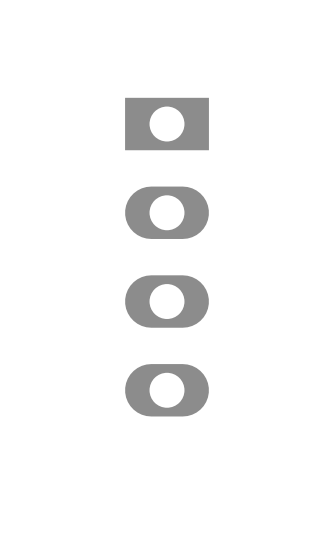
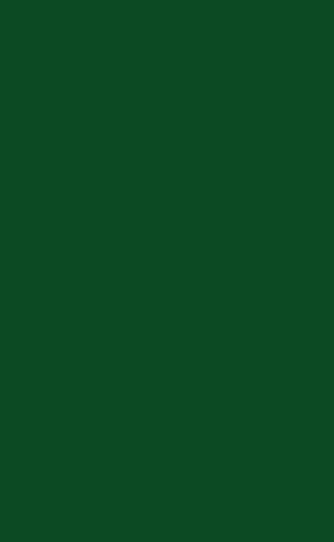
part: (167, 257) -> none

